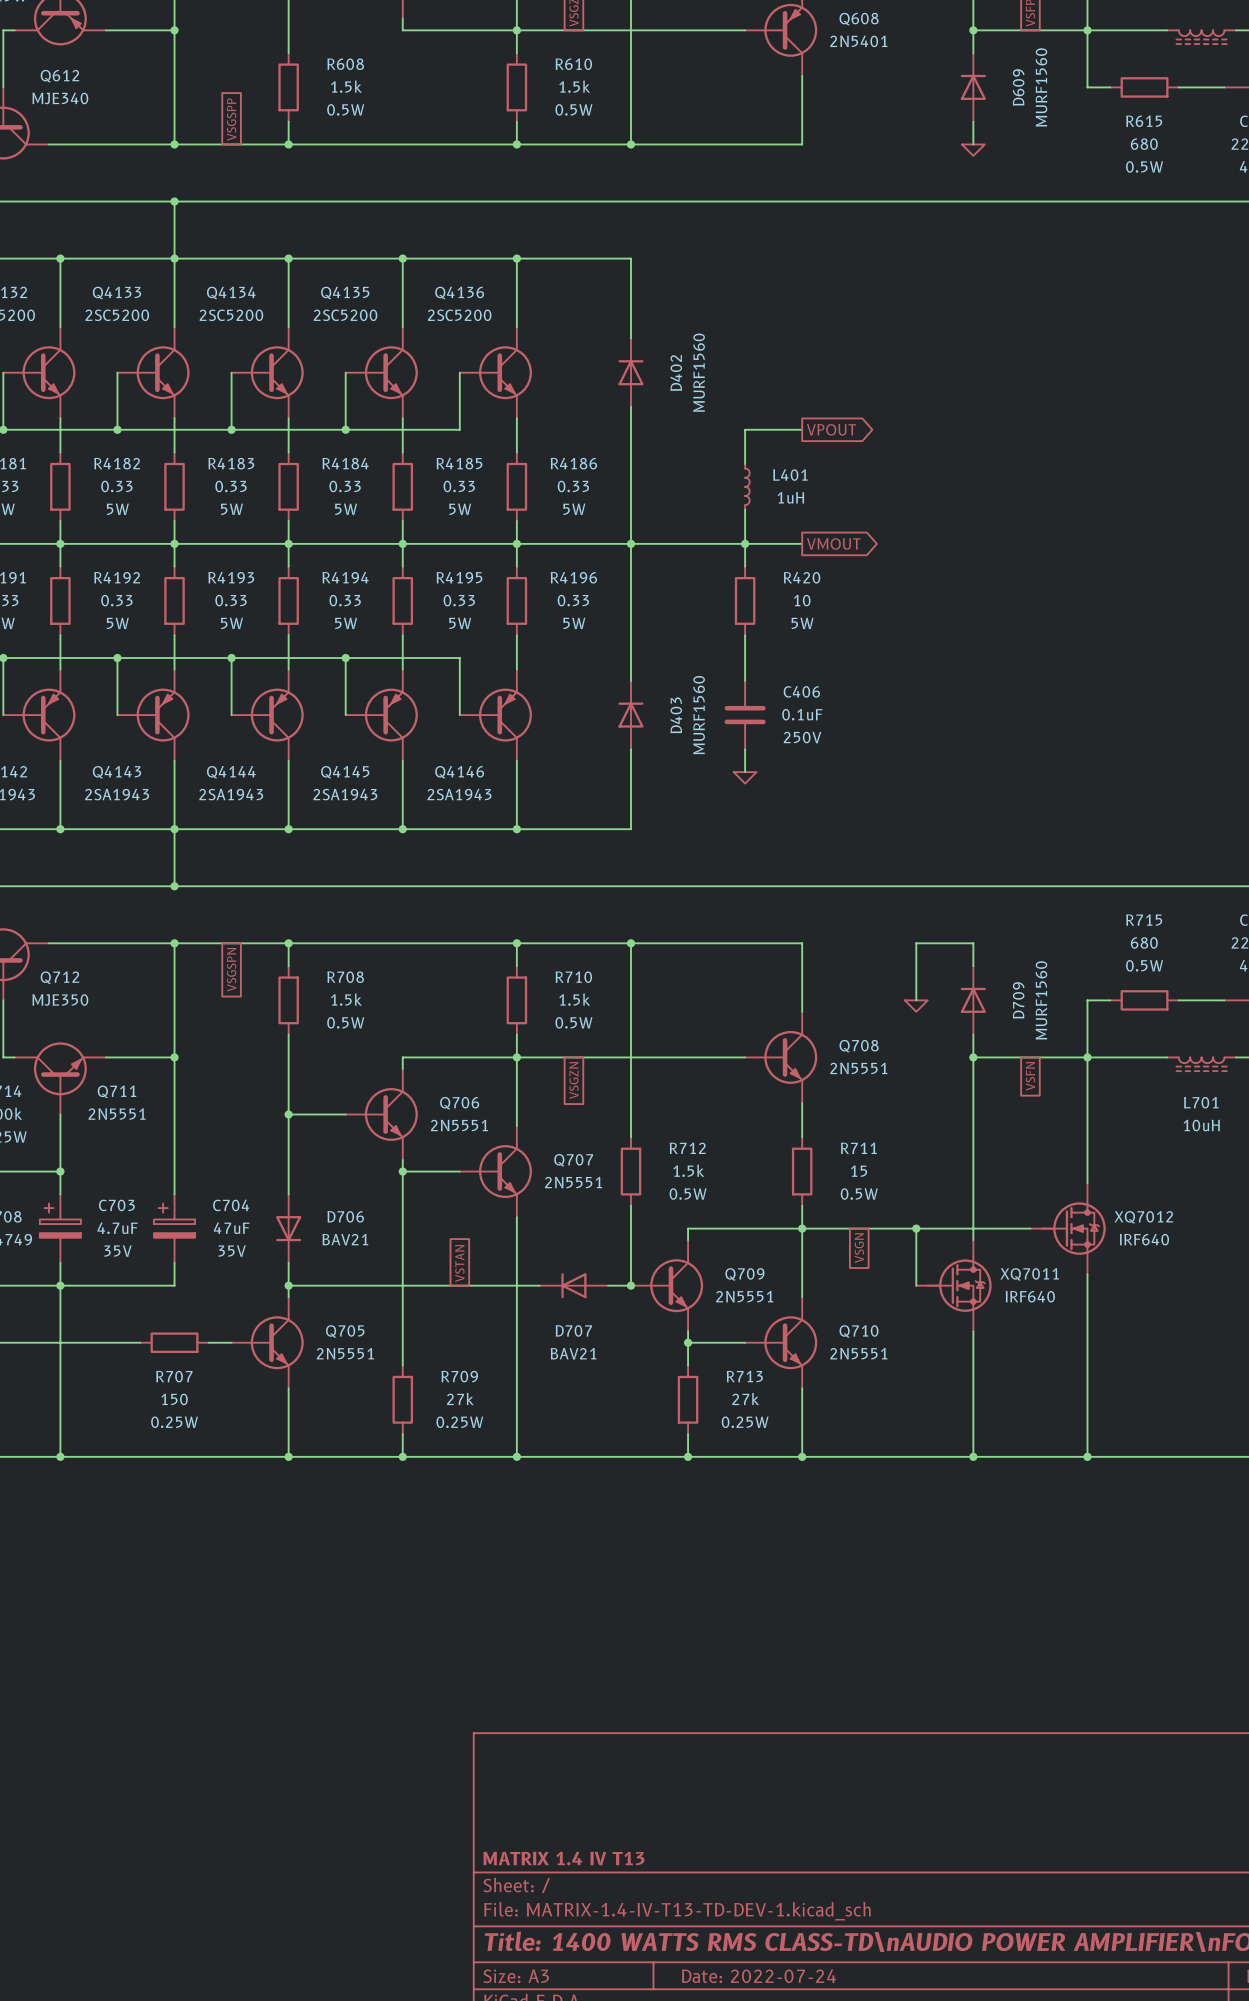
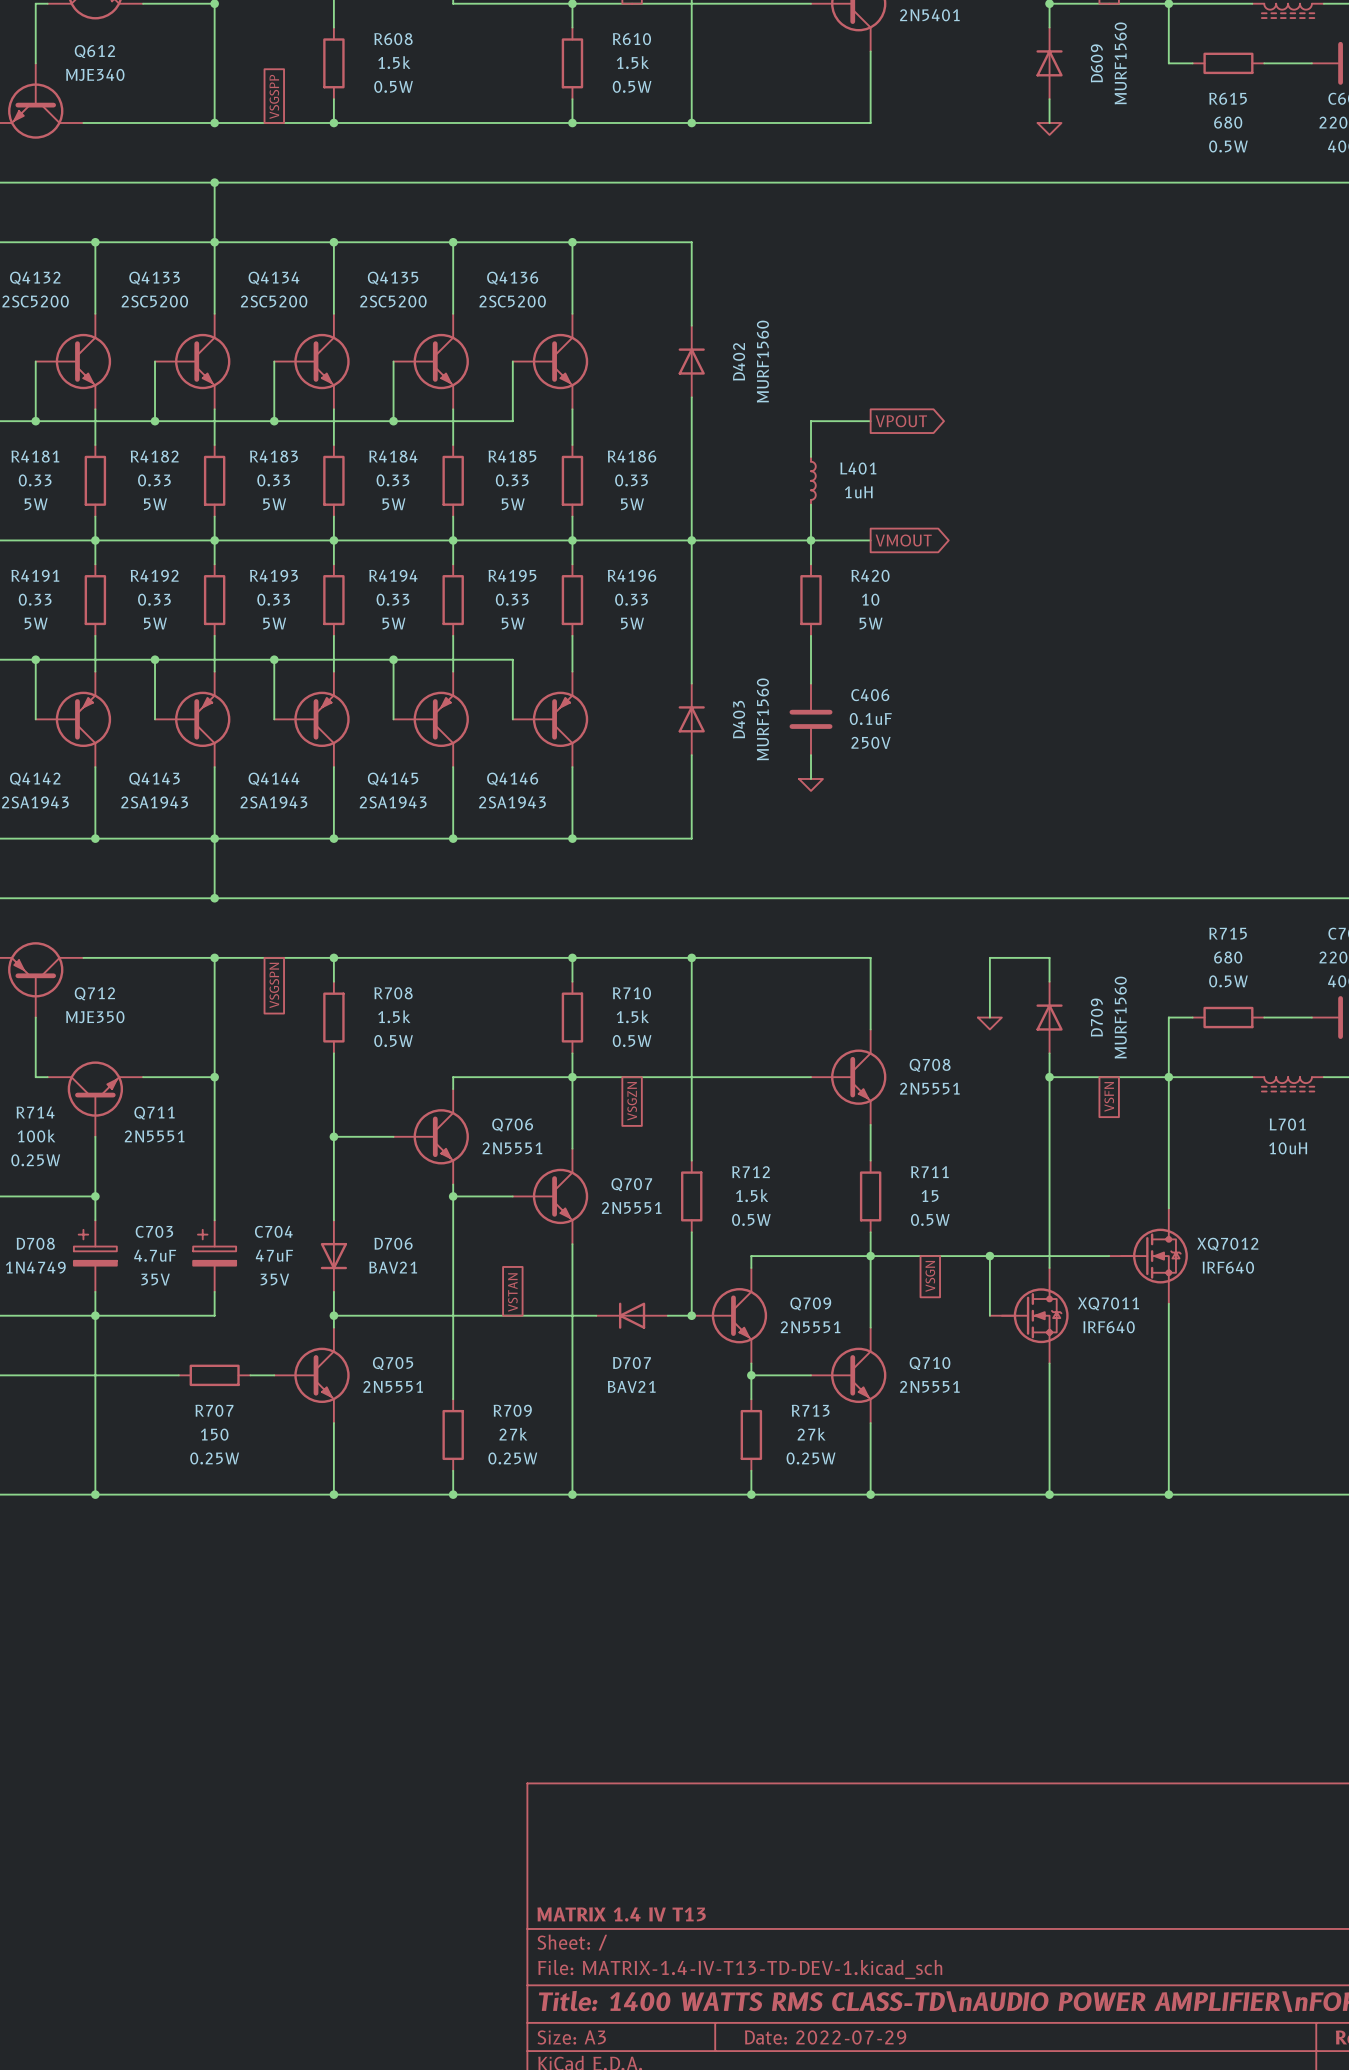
title block: Date: 2022-07-24 (758, 1976) -> Date: 2022-07-29 (825, 2037)

